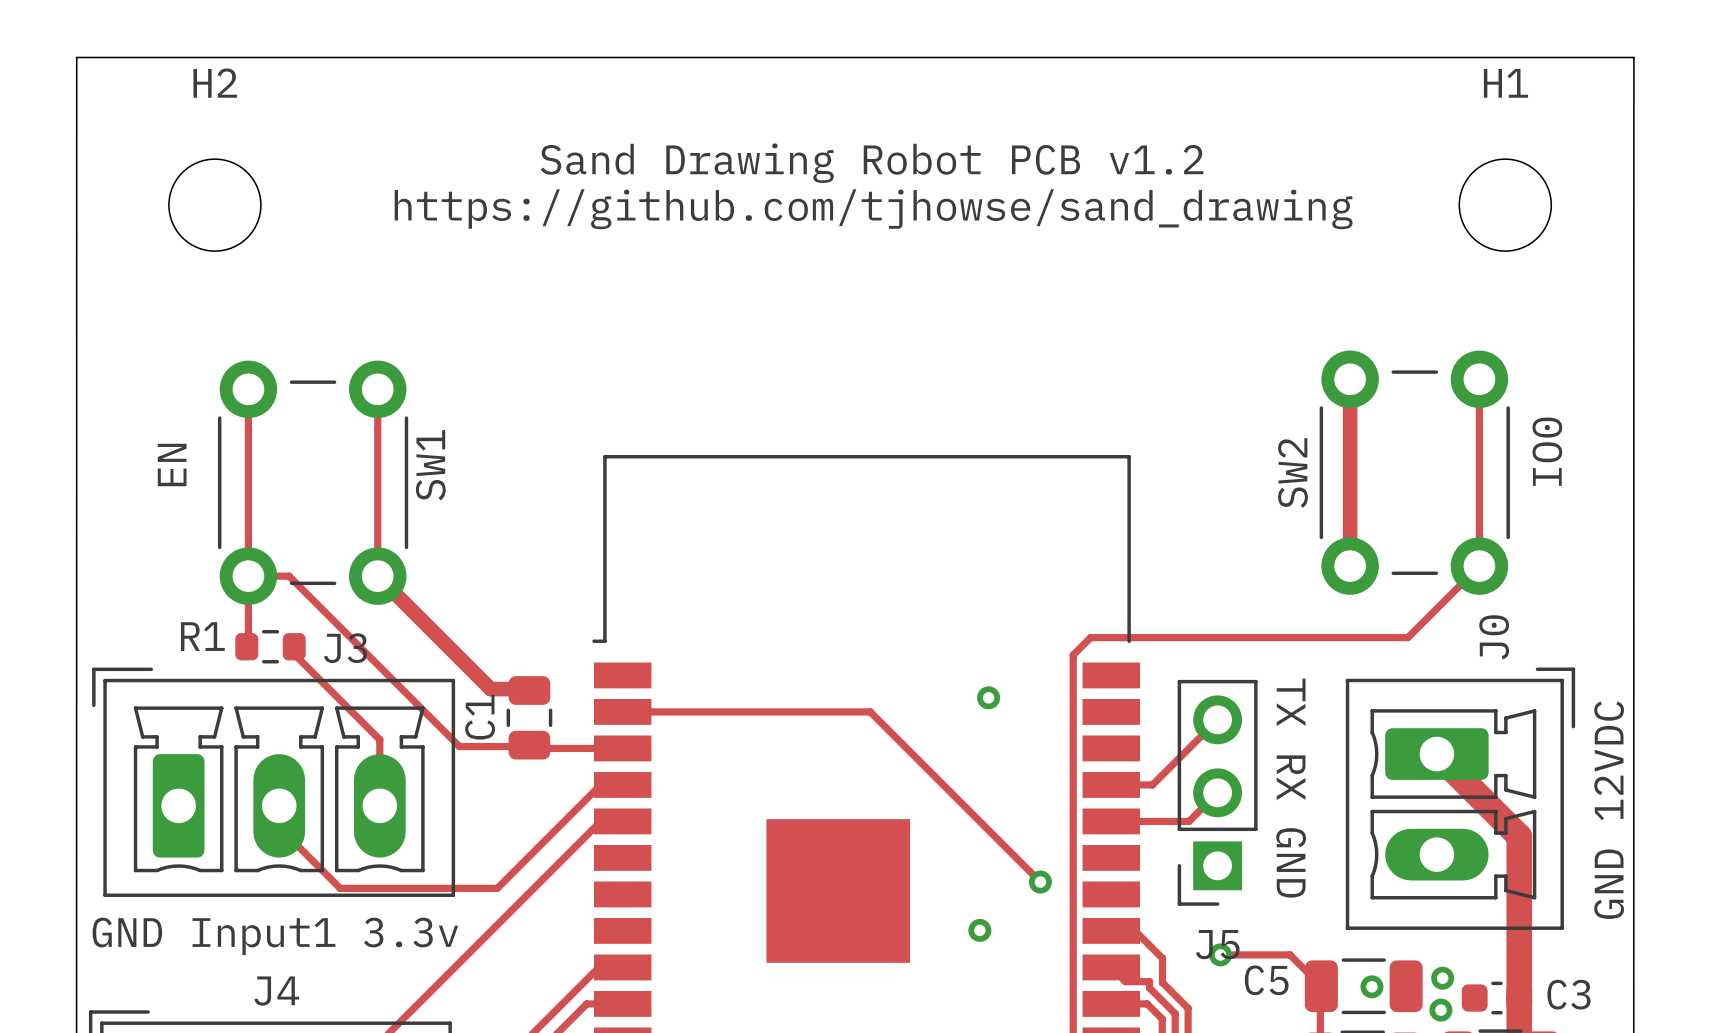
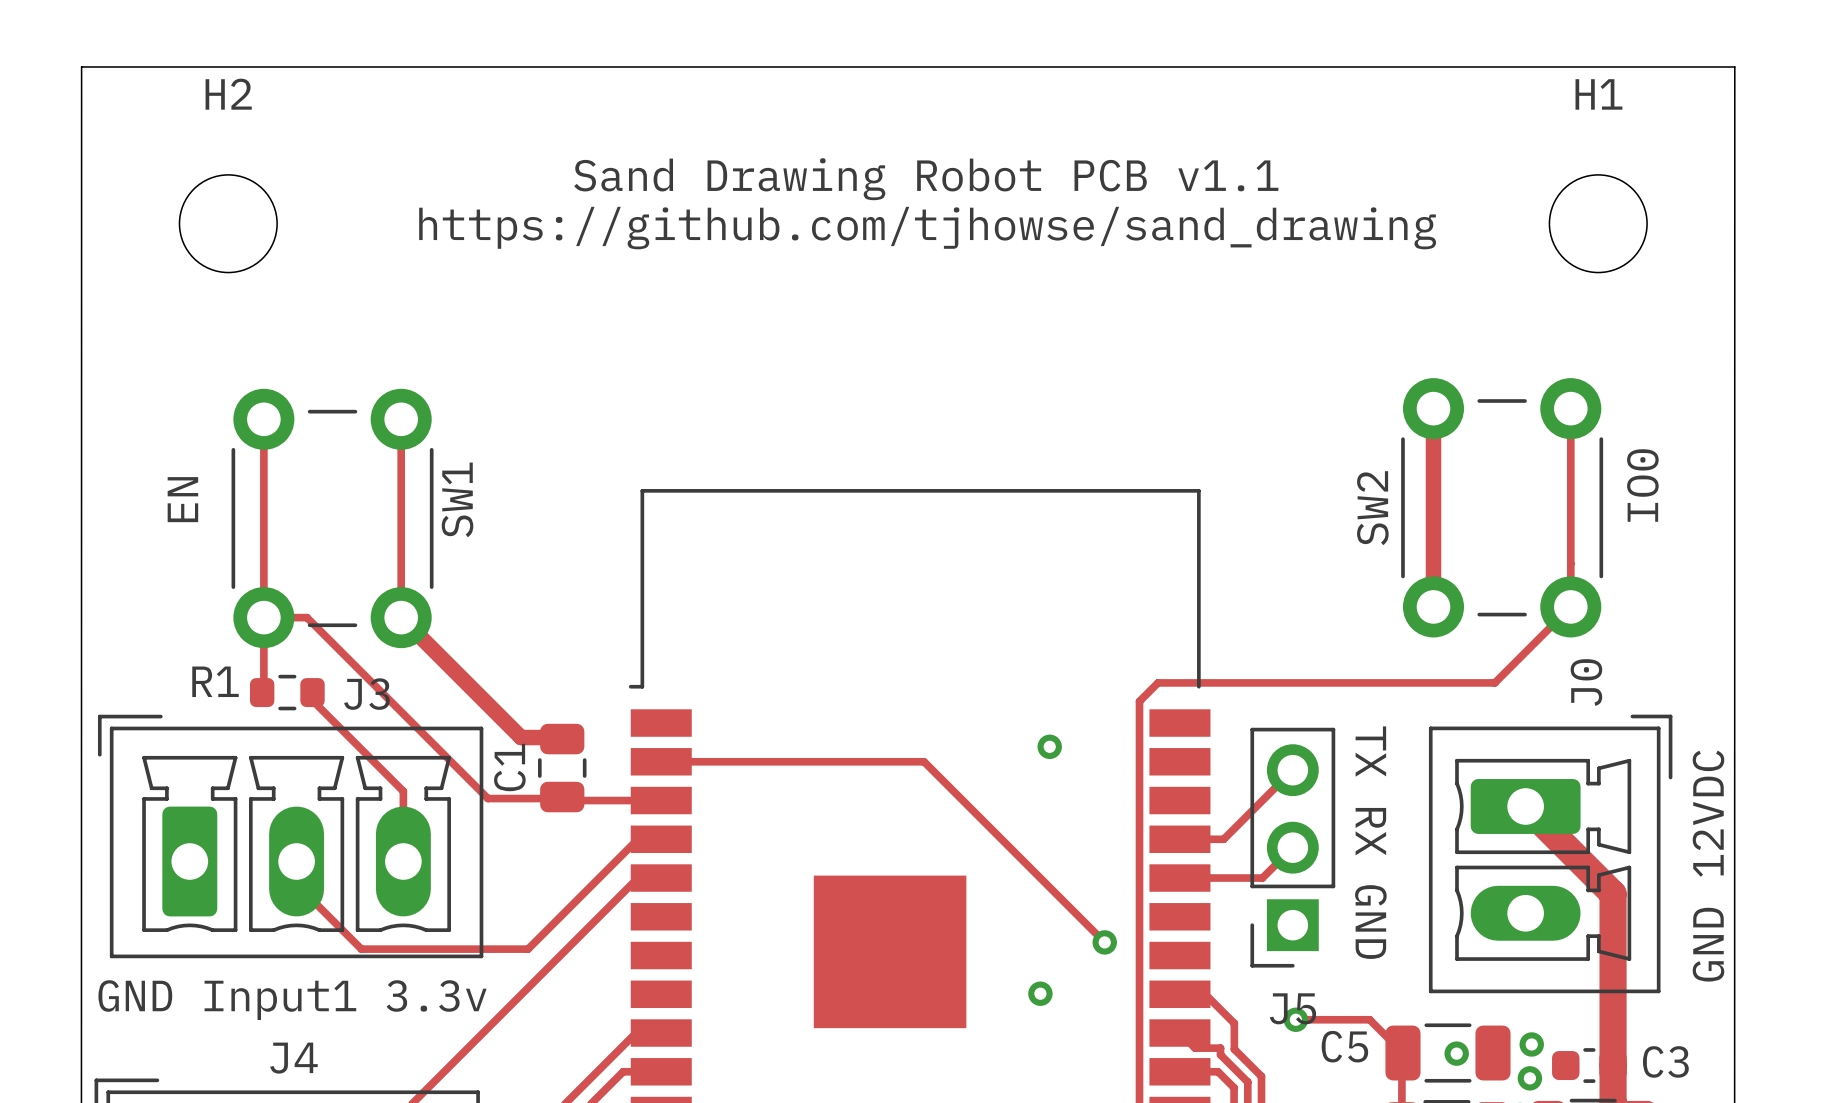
text: Sand Drawing Robot PCB v1.2 (872, 163) -> Sand Drawing Robot PCB v1.1 (926, 179)

